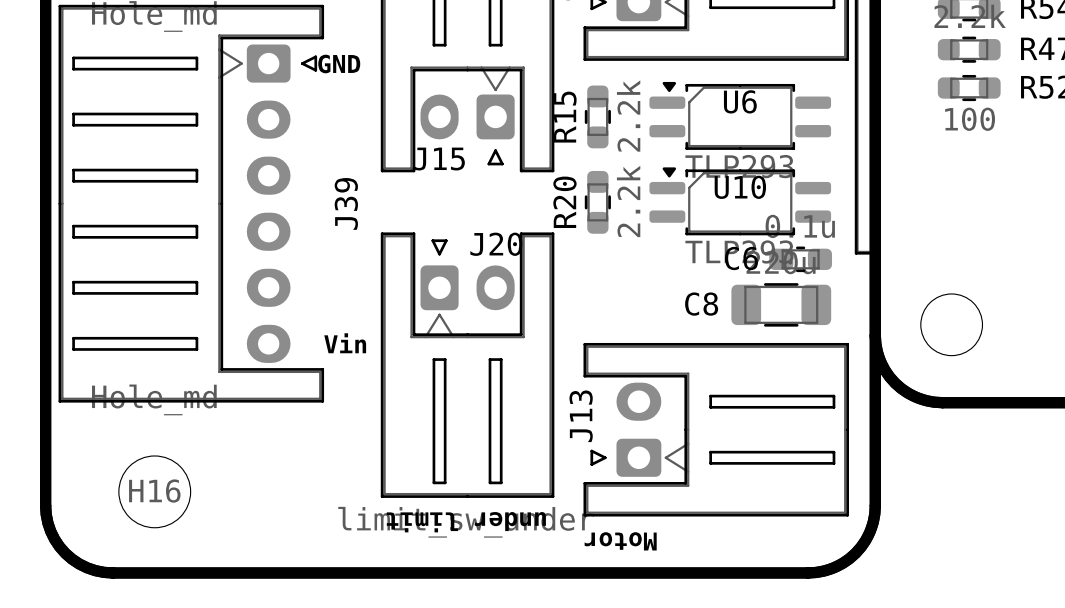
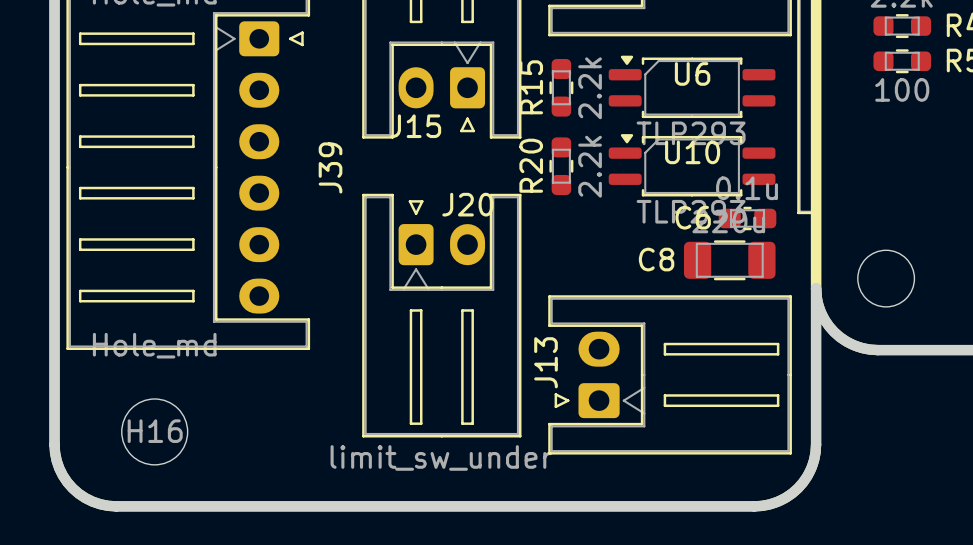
text: GND (339, 64) -> none
text: Vin (345, 343) -> none
text: under limit (466, 522) -> none
text: Motor (620, 541) -> none

